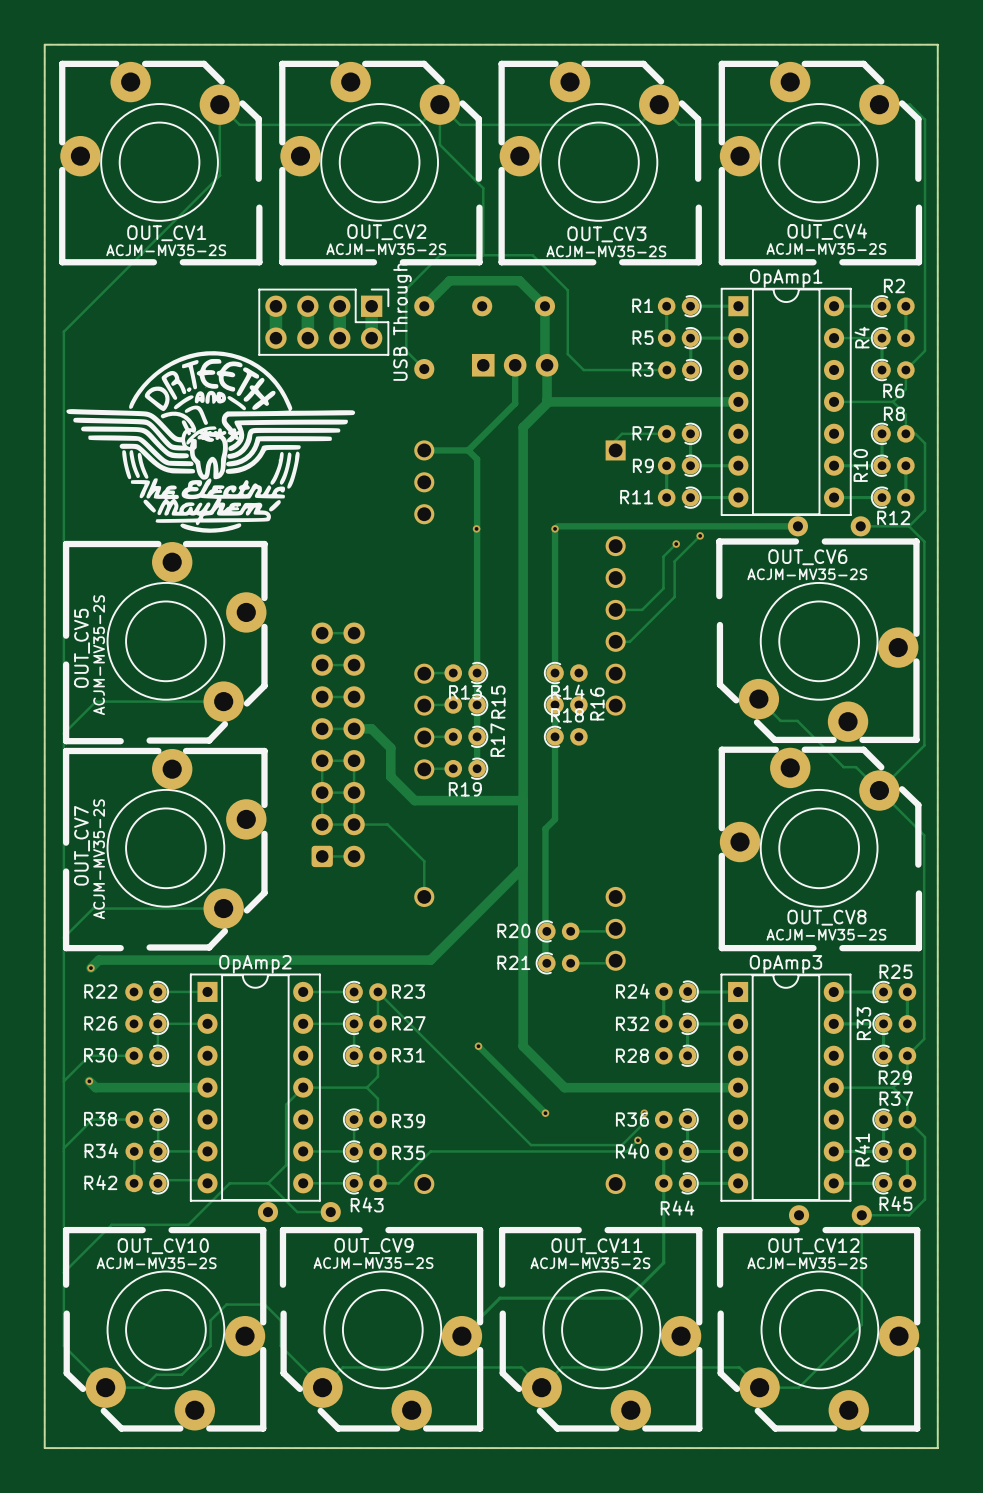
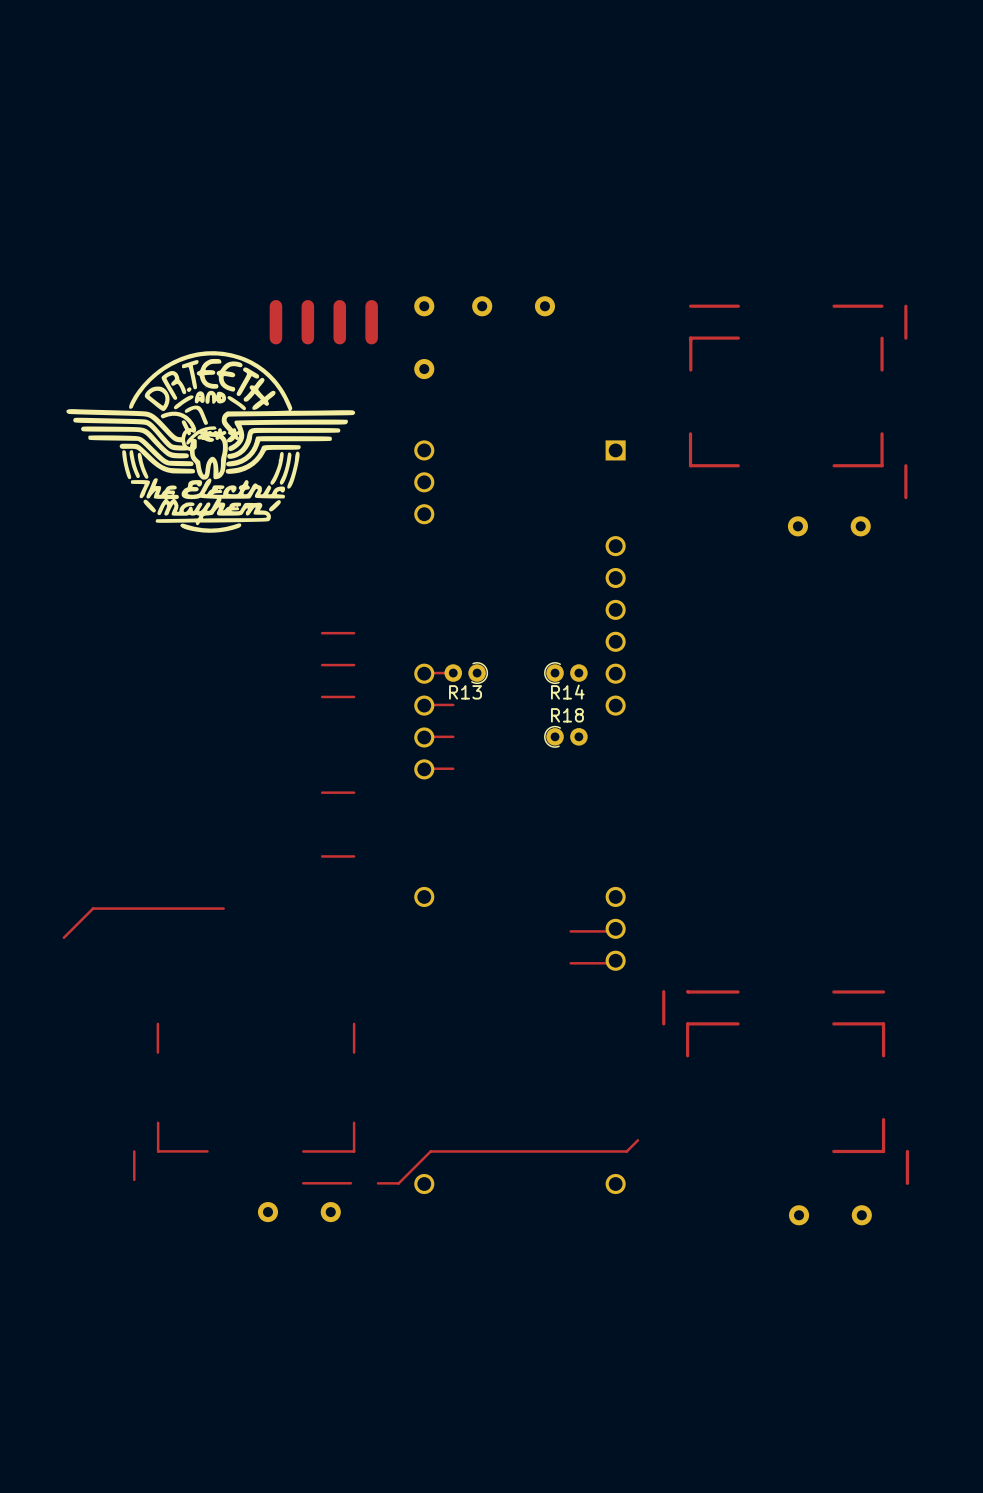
board edge: (44, 44) (937, 44) (937, 1448) (44, 1448) (44, 44) -> none
track: (219, 104) (239, 124) (419, 124) (439, 104) -> none
track: (439, 104) (439, 144) (483, 188) (483, 255) -> none
track: (439, 104) (460, 124) (639, 124) (659, 104) (679, 124) (859, 124) (879, 104) (910, 104) (925, 119) (925, 350) (905, 370) (905, 389) (893, 401) -> none
track: (219, 106) (220, 175) (63, 331) (63, 1345) (105, 1387) (143, 1387) (156, 1374) (181, 1374) (210, 1346) (210, 1320) (226, 1304) (264, 1304) (280, 1320) (280, 1345) (322, 1387) (342, 1367) (521, 1367) (541, 1387) (561, 1367) (739, 1367) (759, 1387) (798, 1387) (861, 1324) (861, 1215) (909, 1215) (925, 1199) (925, 1137) (907, 1119) (907, 1101) (893, 1087) -> none
OUT_CV1: ACJM-MV35-2S (160, 163) -> none
OUT_CV2: ACJM-MV35-2S (380, 163) -> none
OUT_CV3: ACJM-MV35-2S (600, 163) -> none
OUT_CV4: ACJM-MV35-2S (820, 163) -> none
track: (424, 306) (449, 280) (519, 280) (544, 306) (544, 363) (547, 365) (547, 400) (548, 401) -> none
track: (666, 306) (666, 338) -> none
R1: (679, 306) -> none
R2: (892, 306) -> none
USB Through: (323, 322) -> none
R5: (679, 338) -> none
track: (834, 338) (881, 338) -> none
R4: (892, 338) -> none
track: (515, 365) (515, 403) (468, 450) -> none
part: (515, 365) -> none
track: (424, 369) (406, 351) (406, 289) (440, 255) (532, 255) (567, 290) (567, 354) (583, 370) (666, 370) -> none
R3: (679, 370) -> none
R6: (892, 370) -> none
track: (548, 401) (523, 427) (523, 1046) (564, 1087) (738, 1087) -> none
track: (548, 401) (738, 401) -> none
OpAmp1: (786, 401) -> none
track: (834, 401) (893, 401) (905, 414) (905, 433) (915, 433) (925, 443) (925, 510) (909, 526) -> none
track: (666, 433) (622, 433) (615, 440) (615, 450) -> none
R7: (679, 433) -> none
R8: (892, 433) -> none
track: (424, 450) (468, 450) -> none
track: (468, 450) (477, 459) (477, 768) -> none
track: (666, 465) (666, 497) -> none
R9: (679, 465) -> none
R10: (892, 465) -> none
R11: (679, 497) -> none
track: (690, 497) (738, 497) -> none
track: (834, 497) (881, 497) -> none
R12: (892, 497) -> none
track: (797, 526) (557, 526) (555, 528) (555, 819) (545, 828) (546, 963) -> none
track: (860, 526) (909, 526) -> none
track: (909, 526) (924, 541) (924, 745) (879, 790) -> none
via: (476, 528) -> none
via: (555, 528) -> none
track: (700, 535) (674, 561) (674, 596) (629, 641) (615, 641) -> none
via: (700, 535) -> none
track: (676, 544) (663, 556) (663, 588) (642, 609) (615, 609) -> none
via: (676, 544) -> none
OUT_CV6: ACJM-MV35-2S (817, 640) -> none
OUT_CV5: ACJM-MV35-2S (165, 642) -> none
track: (758, 699) (780, 720) (797, 720) (843, 767) (856, 767) (924, 835) (924, 1039) (907, 1055) (907, 1073) (893, 1087) -> none
track: (223, 701) (95, 701) (63, 733) -> none
R15: (466, 704) -> none
R16: (565, 704) -> none
track: (322, 728) (371, 728) (390, 748) (390, 776) (414, 800) (523, 800) -> none
R17: (466, 736) -> none
part: (338, 744) -> none
R19: (466, 768) -> none
track: (354, 824) (354, 760) (322, 760) (322, 824) (387, 824) (424, 861) (424, 896) -> none
OUT_CV8: ACJM-MV35-2S (820, 848) -> none
OUT_CV7: ACJM-MV35-2S (165, 849) -> none
track: (523, 867) (430, 960) (98, 960) (90, 968) -> none
R20: (557, 931) -> none
R21: (557, 963) -> none
via: (90, 968) -> none
track: (207, 991) (161, 991) (157, 995) -> none
R24: (676, 991) -> none
R22: (147, 992) -> none
track: (306, 992) (354, 992) -> none
R23: (364, 992) -> none
track: (377, 992) (531, 1145) (622, 1145) (644, 1122) (644, 1113) -> none
R25: (894, 992) -> none
track: (907, 992) (907, 1023) -> none
track: (377, 995) (377, 1023) -> none
R26: (147, 1023) -> none
track: (157, 1023) (207, 1023) -> none
track: (303, 1023) (354, 1023) -> none
R27: (364, 1023) -> none
R32: (676, 1023) -> none
R33: (894, 1023) -> none
track: (478, 1046) (545, 1113) -> none
via: (478, 1046) -> none
track: (377, 1052) (377, 1076) (366, 1087) (303, 1087) (286, 1104) (286, 1165) (267, 1183) -> none
track: (134, 1055) (89, 1055) (63, 1081) -> none
R30: (147, 1055) -> none
R31: (364, 1055) -> none
R28: (676, 1055) -> none
R29: (894, 1055) -> none
track: (89, 1081) (95, 1087) (207, 1087) -> none
via: (89, 1081) -> none
OpAmp2: (255, 1087) -> none
track: (366, 1087) (377, 1098) (377, 1122) -> none
OpAmp3: (785, 1087) -> none
track: (833, 1087) (893, 1087) -> none
via: (545, 1113) -> none
via: (644, 1113) -> none
track: (134, 1119) (92, 1119) (63, 1148) -> none
R38: (147, 1119) -> none
R39: (364, 1119) -> none
R36: (676, 1119) -> none
track: (687, 1119) (687, 1151) (738, 1151) -> none
R37: (894, 1119) -> none
via: (637, 1140) -> none
R34: (147, 1151) -> none
R35: (364, 1151) -> none
track: (377, 1151) (377, 1180) -> none
track: (663, 1151) (663, 1262) (628, 1298) (499, 1298) (461, 1336) -> none
R40: (676, 1151) -> none
R41: (894, 1151) -> none
track: (157, 1180) (204, 1180) (207, 1183) -> none
R42: (147, 1183) -> none
R43: (364, 1183) -> none
R44: (676, 1183) -> none
track: (687, 1183) (738, 1183) -> none
track: (833, 1183) (883, 1183) -> none
R45: (894, 1183) -> none
track: (330, 1212) (297, 1212) (268, 1183) (229, 1183) (188, 1224) (111, 1224) (63, 1272) -> none
OUT_CV10: ACJM-MV35-2S (164, 1329) -> none
OUT_CV9: ACJM-MV35-2S (381, 1329) -> none
OUT_CV11: ACJM-MV35-2S (600, 1329) -> none
OUT_CV12: ACJM-MV35-2S (818, 1329) -> none

